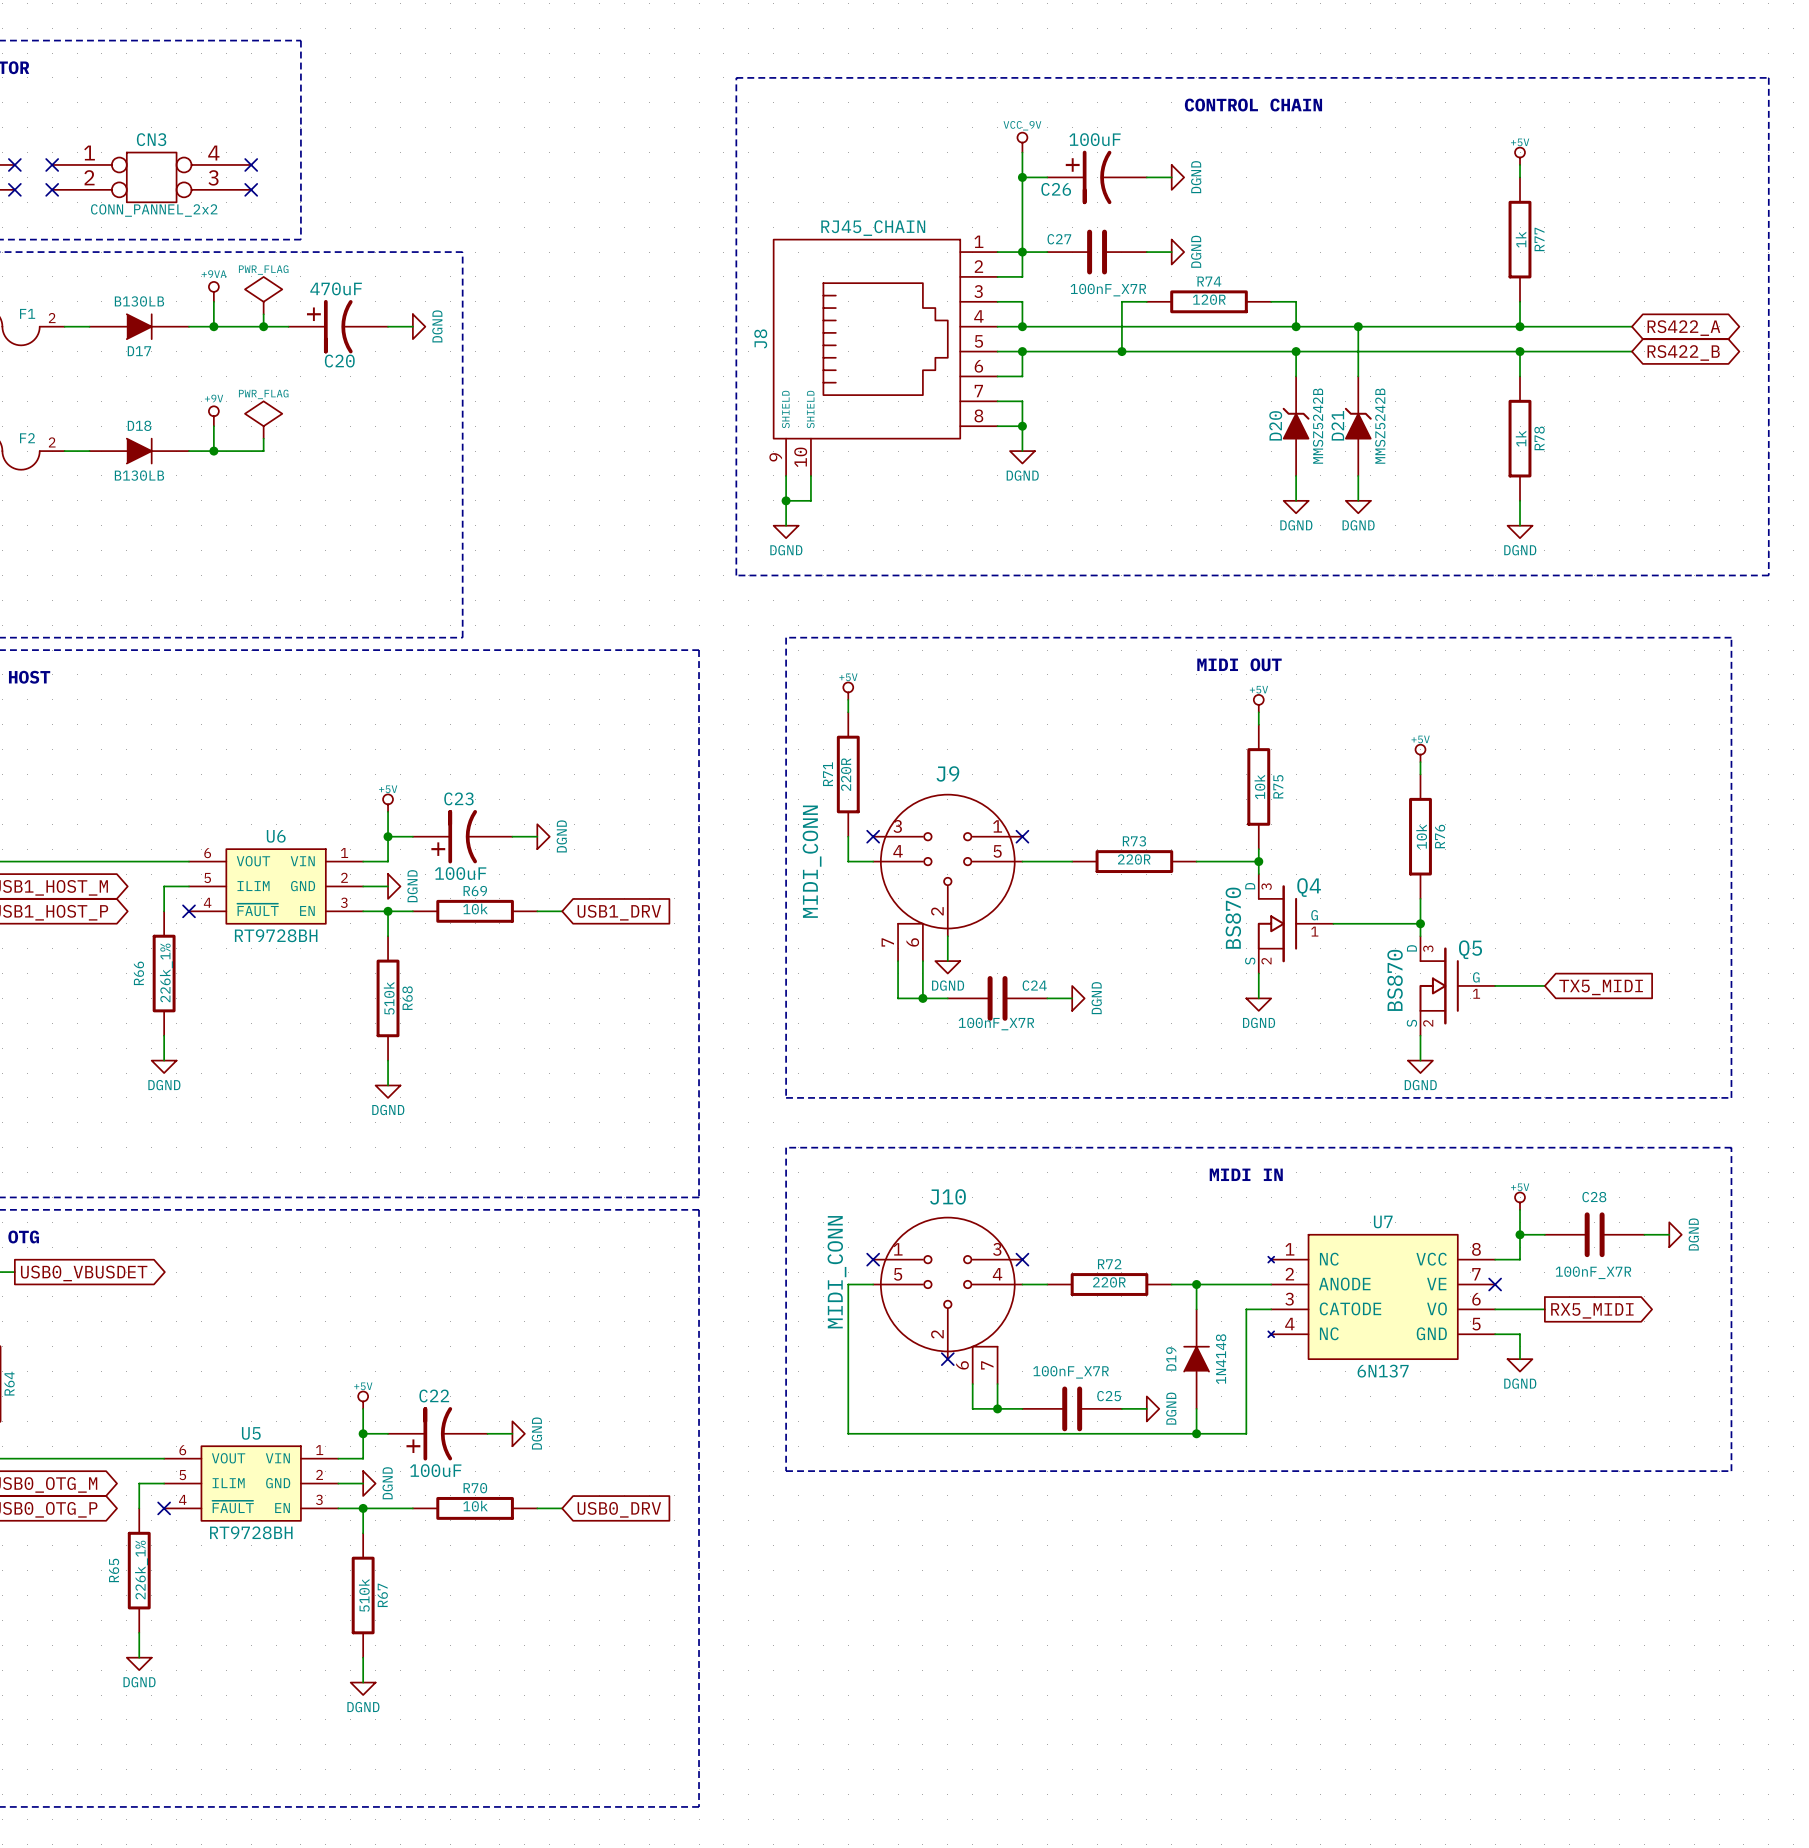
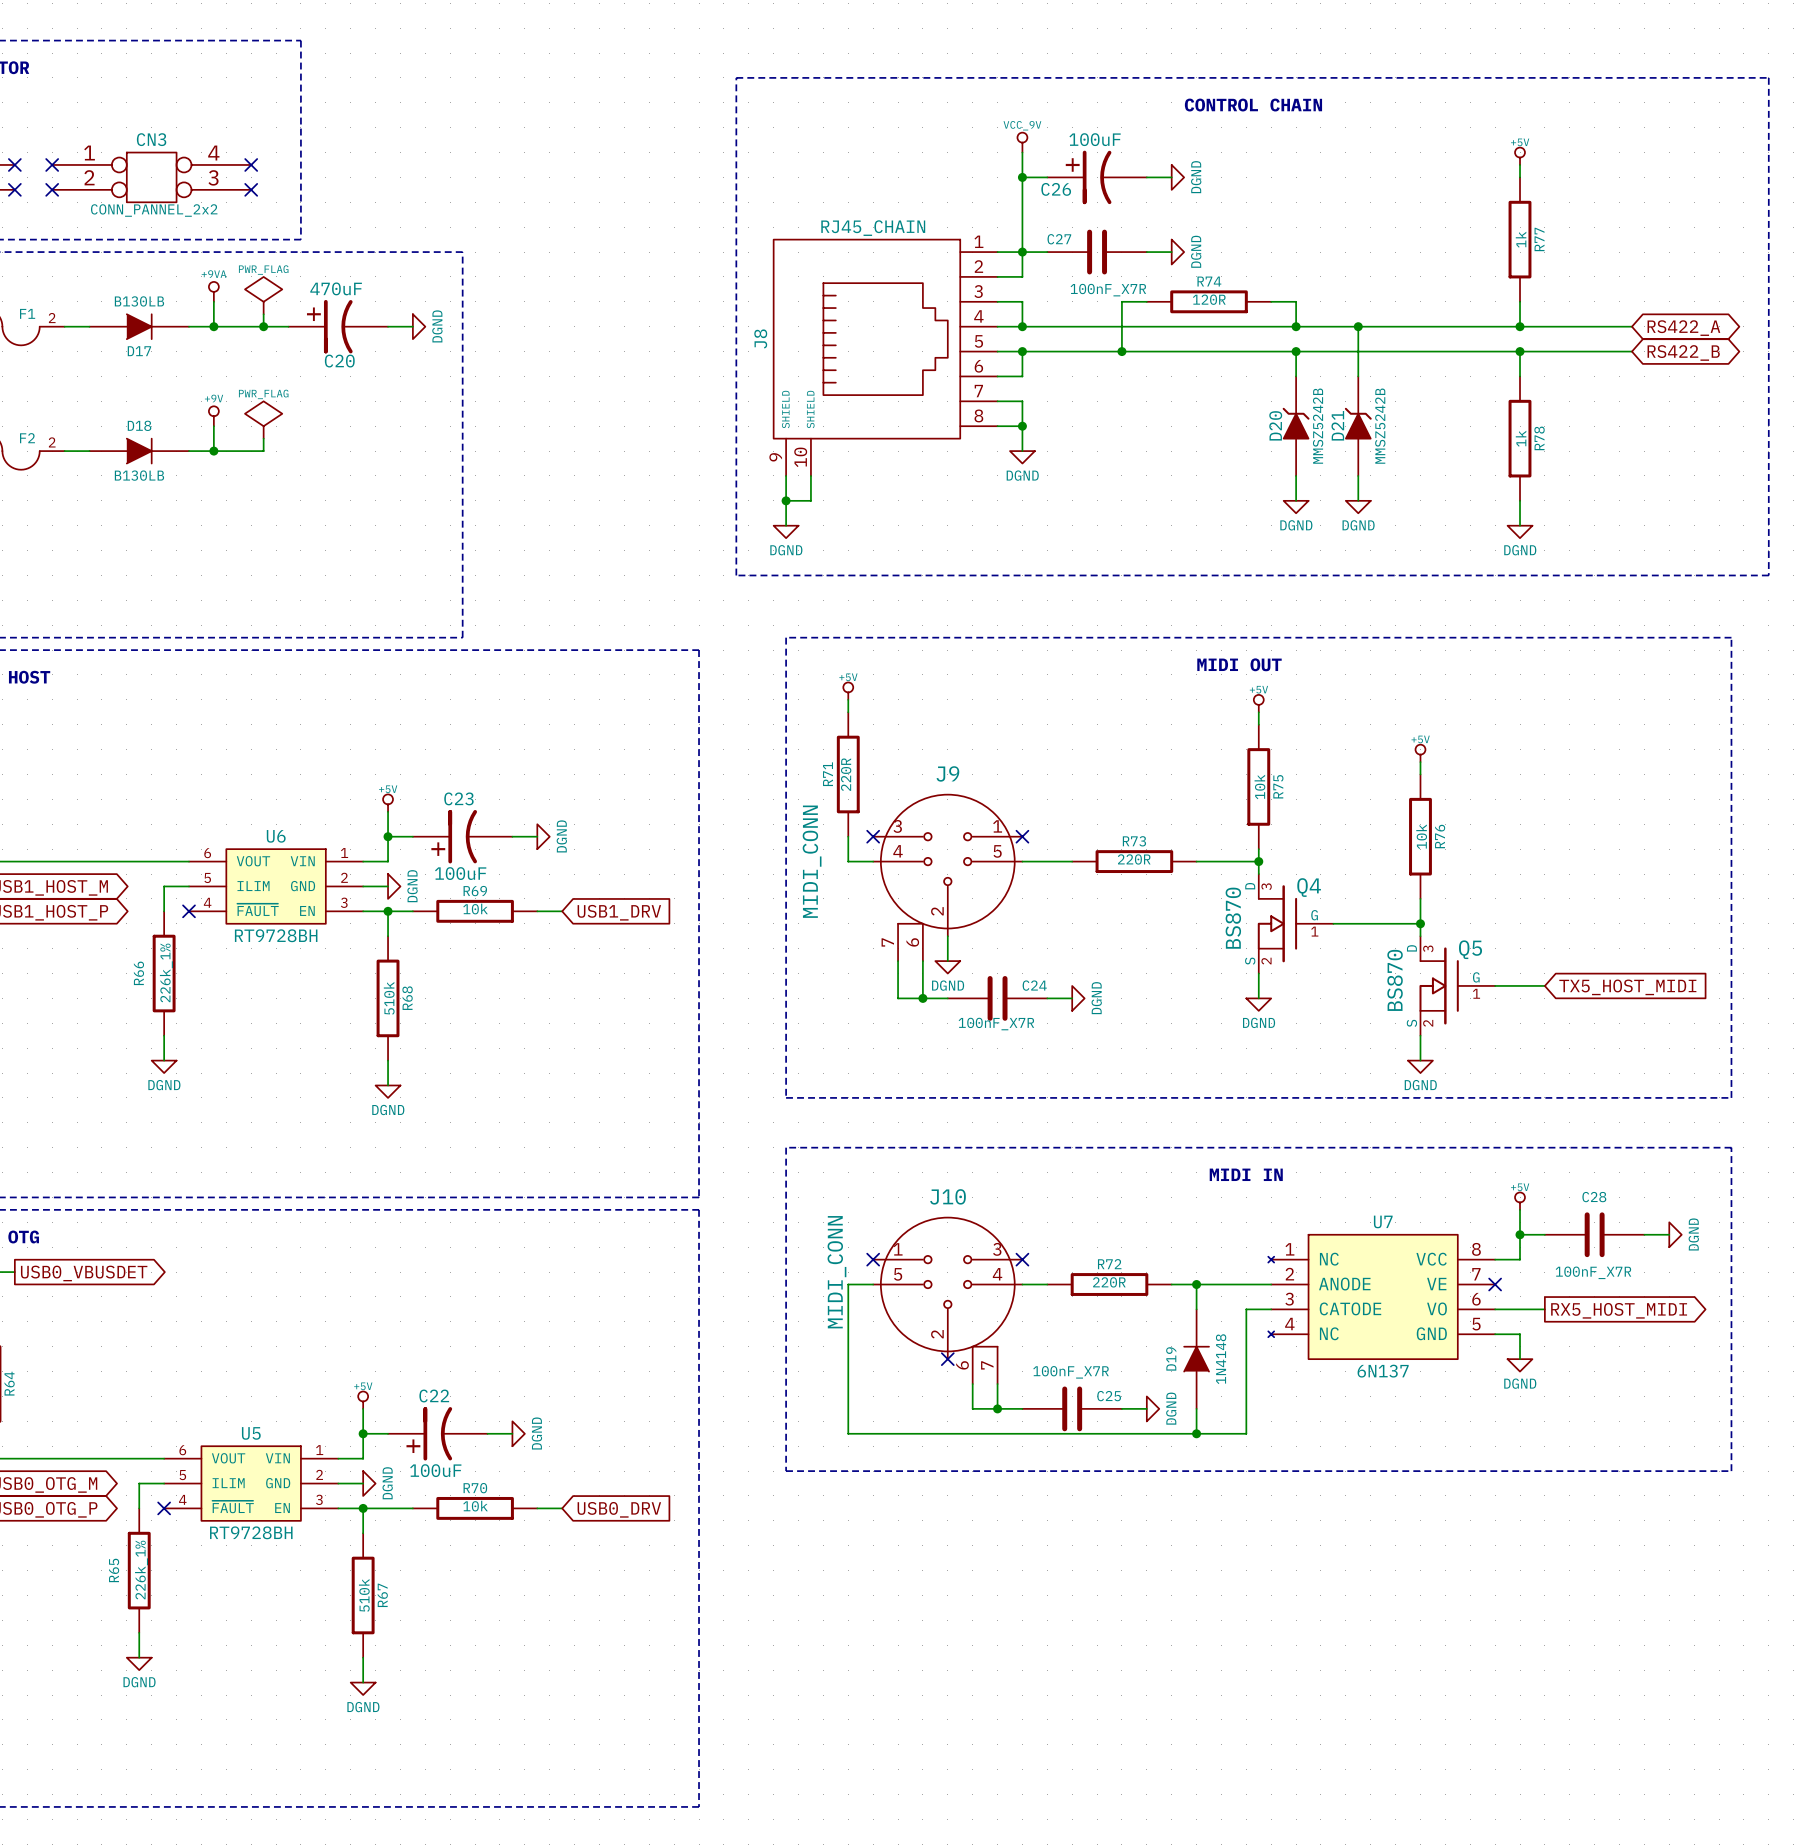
global label: TX5_MIDI (1601, 987) -> TX5_HOST_MIDI (1627, 987)
global label: RX5_MIDI (1592, 1310) -> RX5_HOST_MIDI (1619, 1310)

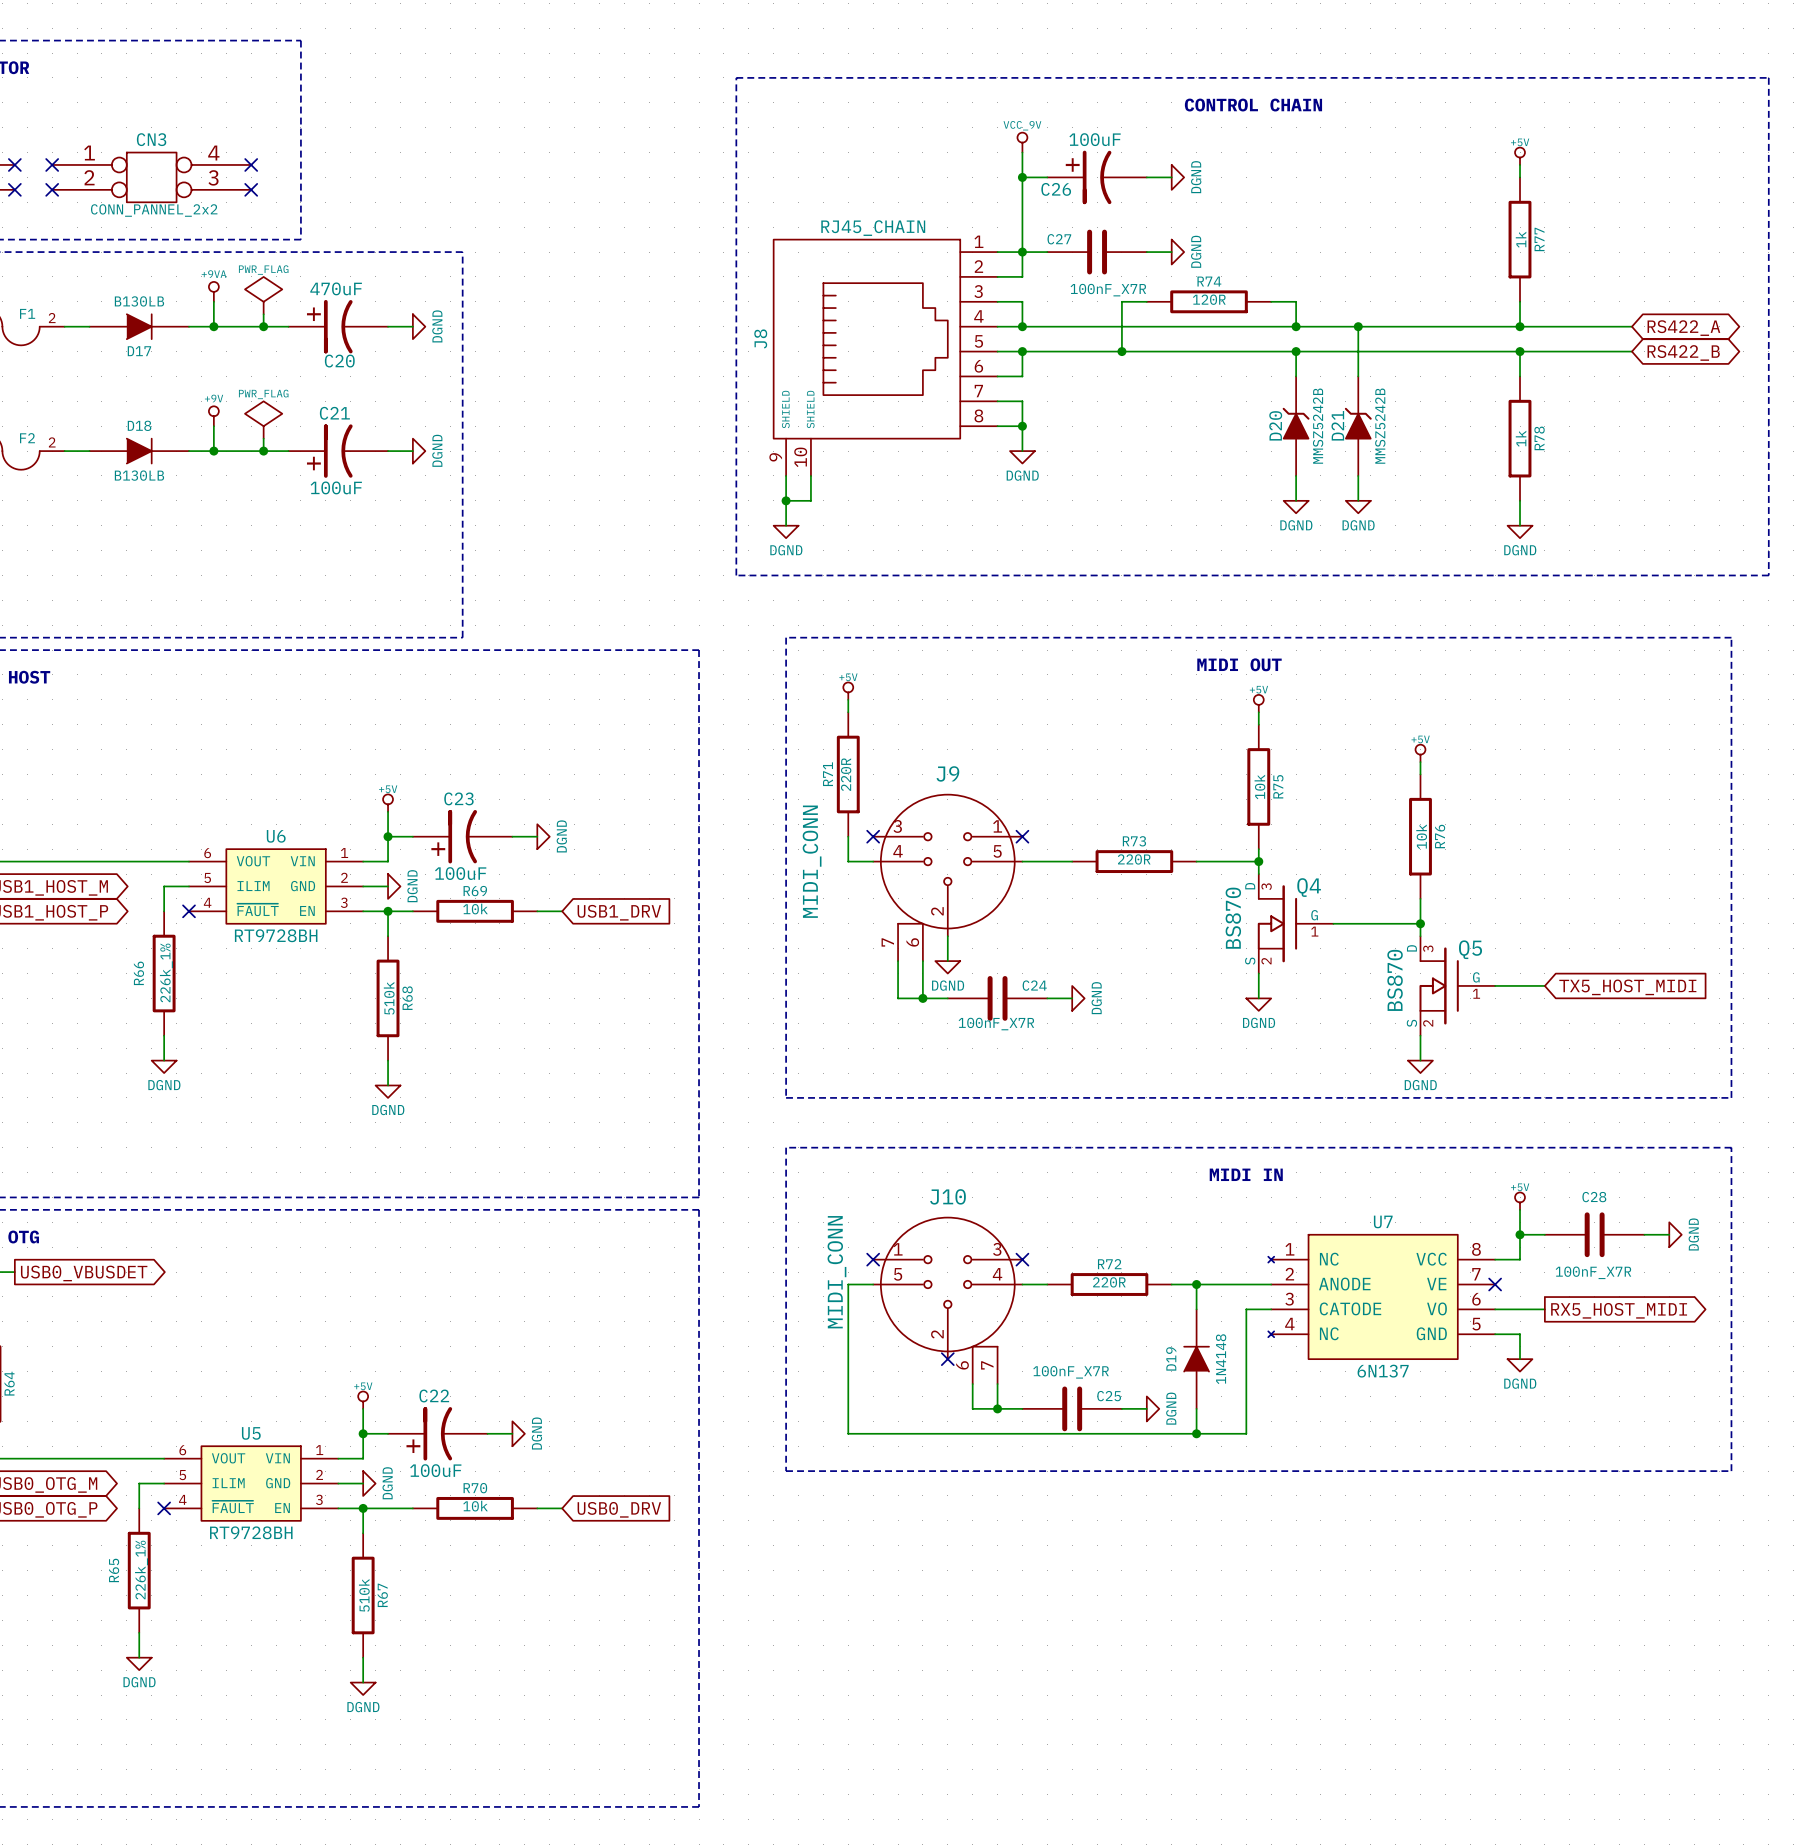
wire: none -> (263, 451) (288, 451)
junction: none -> (263, 451)
C21: none -> 100uF (338, 451)
wire: none -> (388, 451) (412, 451)
power symbol: none -> DGND (419, 451)

